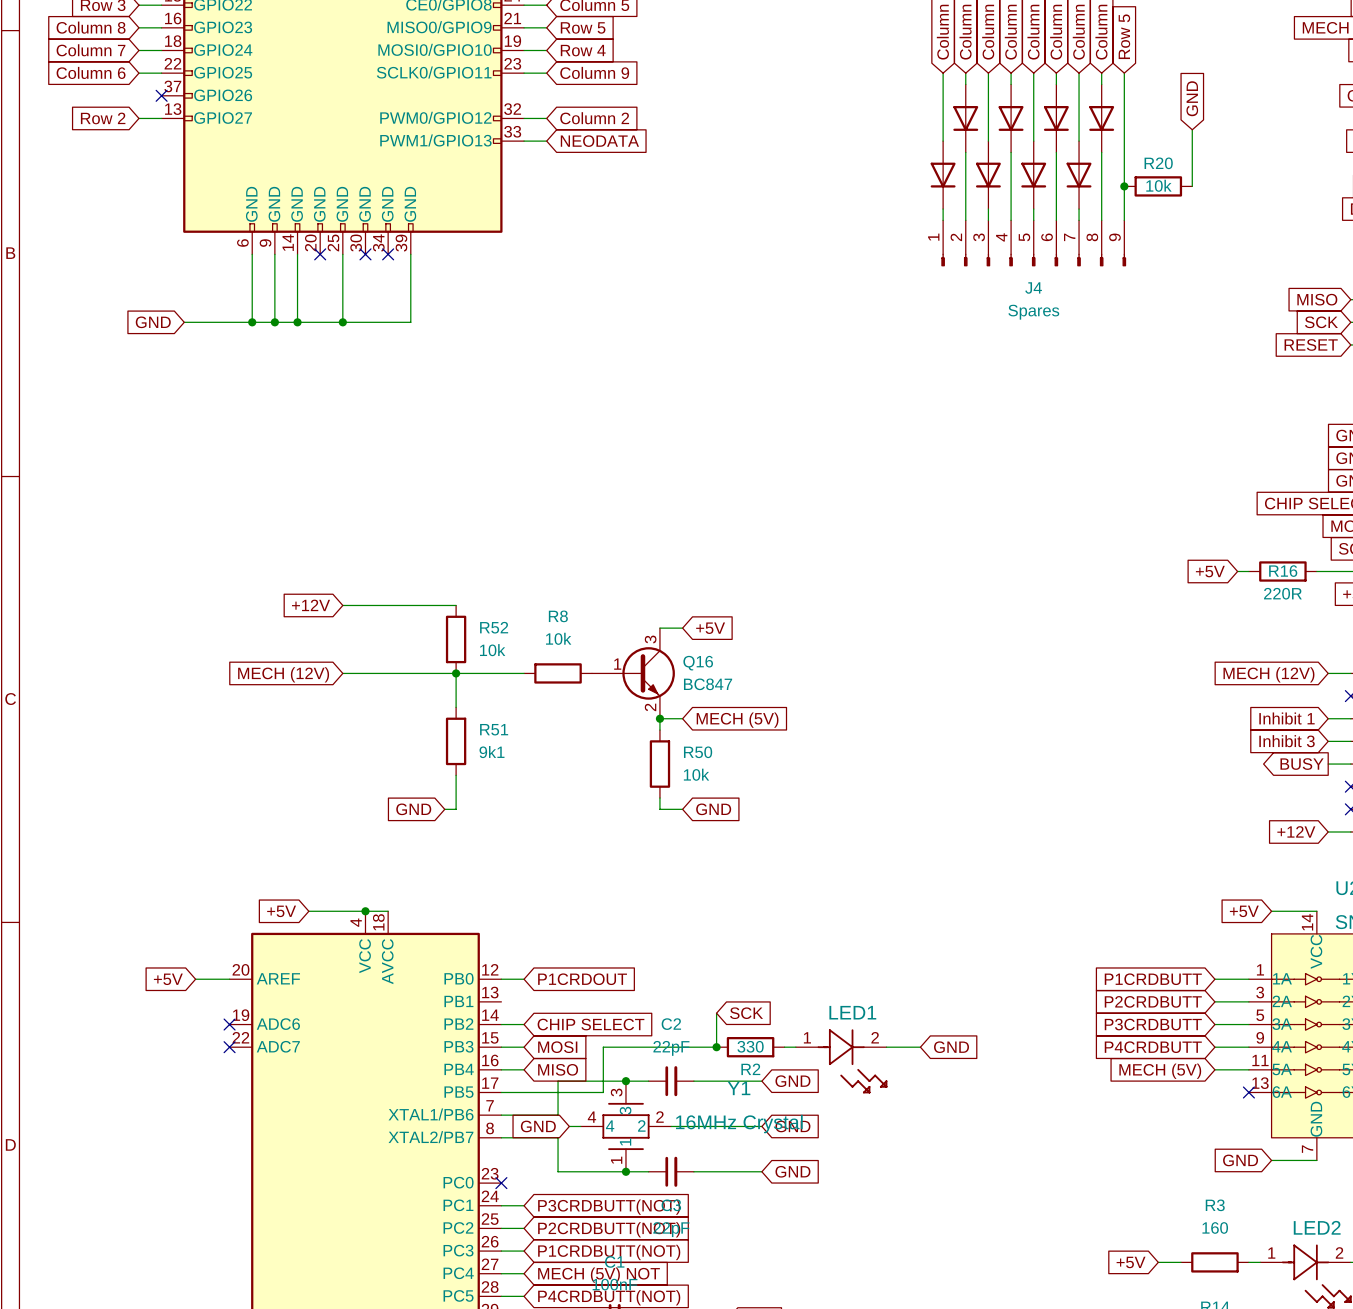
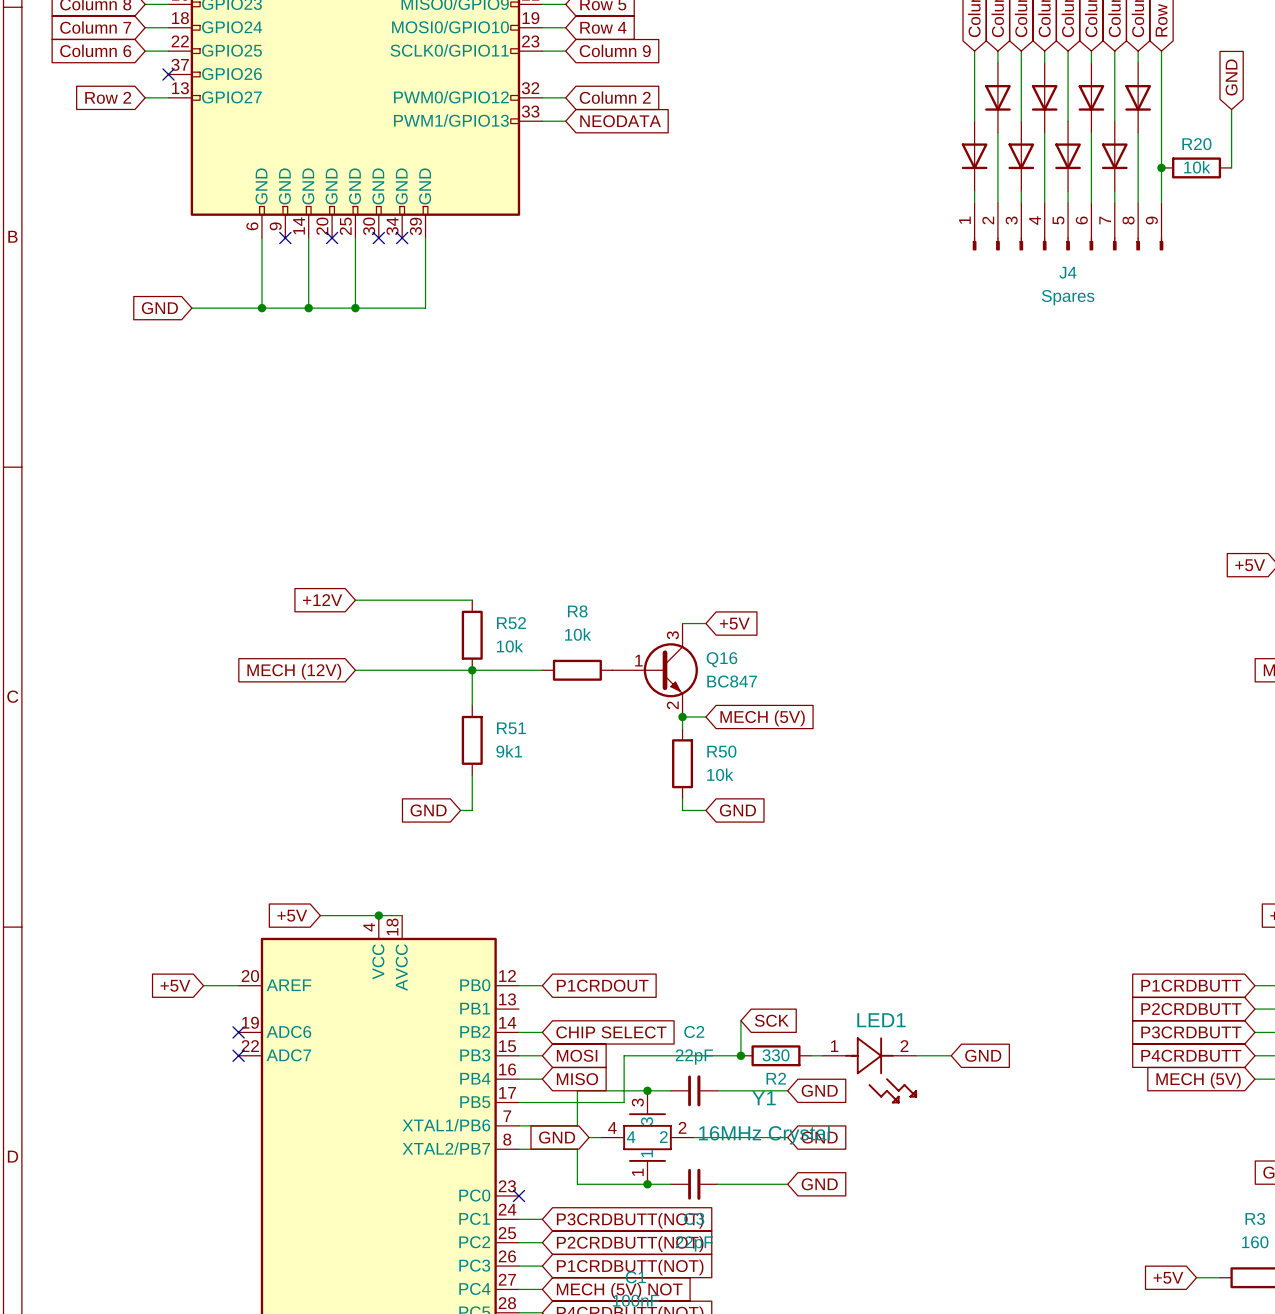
wire: (274, 254) (274, 322) -> none
no-connect mark: none -> (285, 238)
junction: (274, 322) -> none

